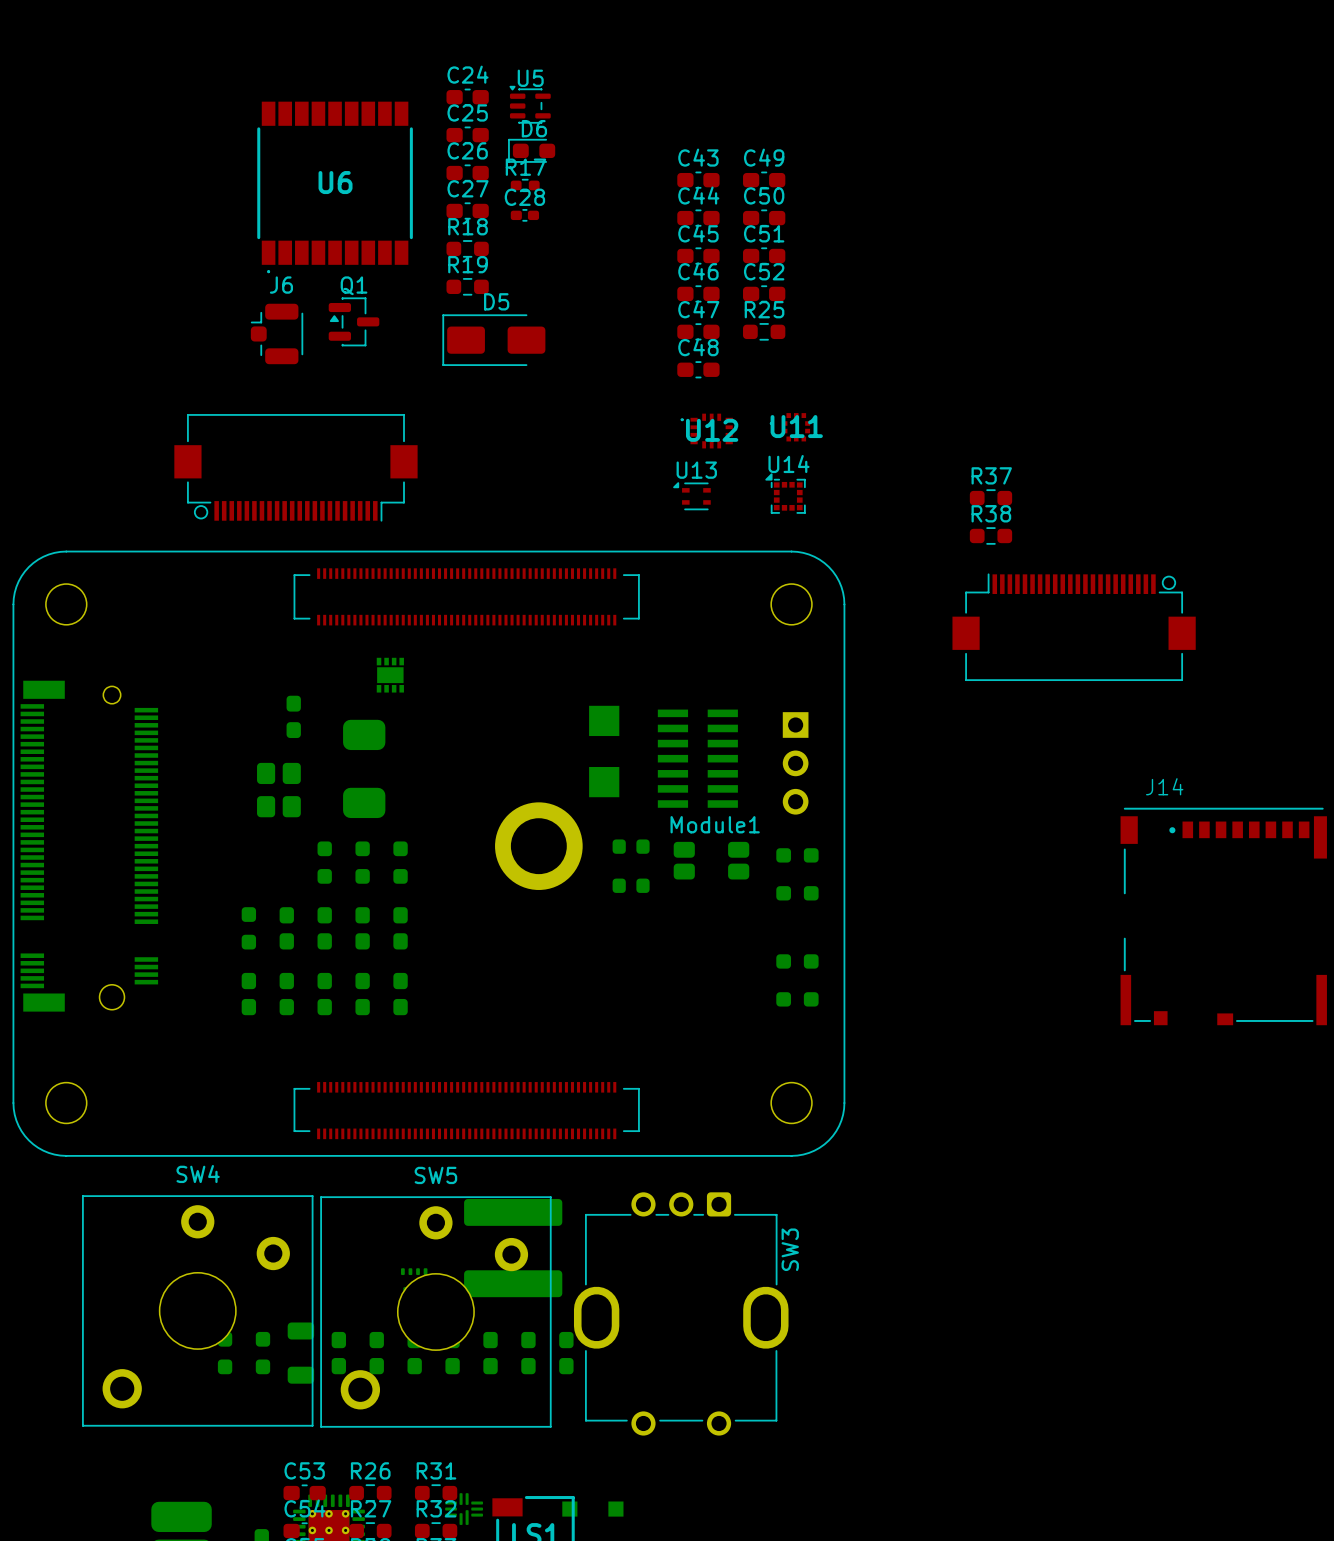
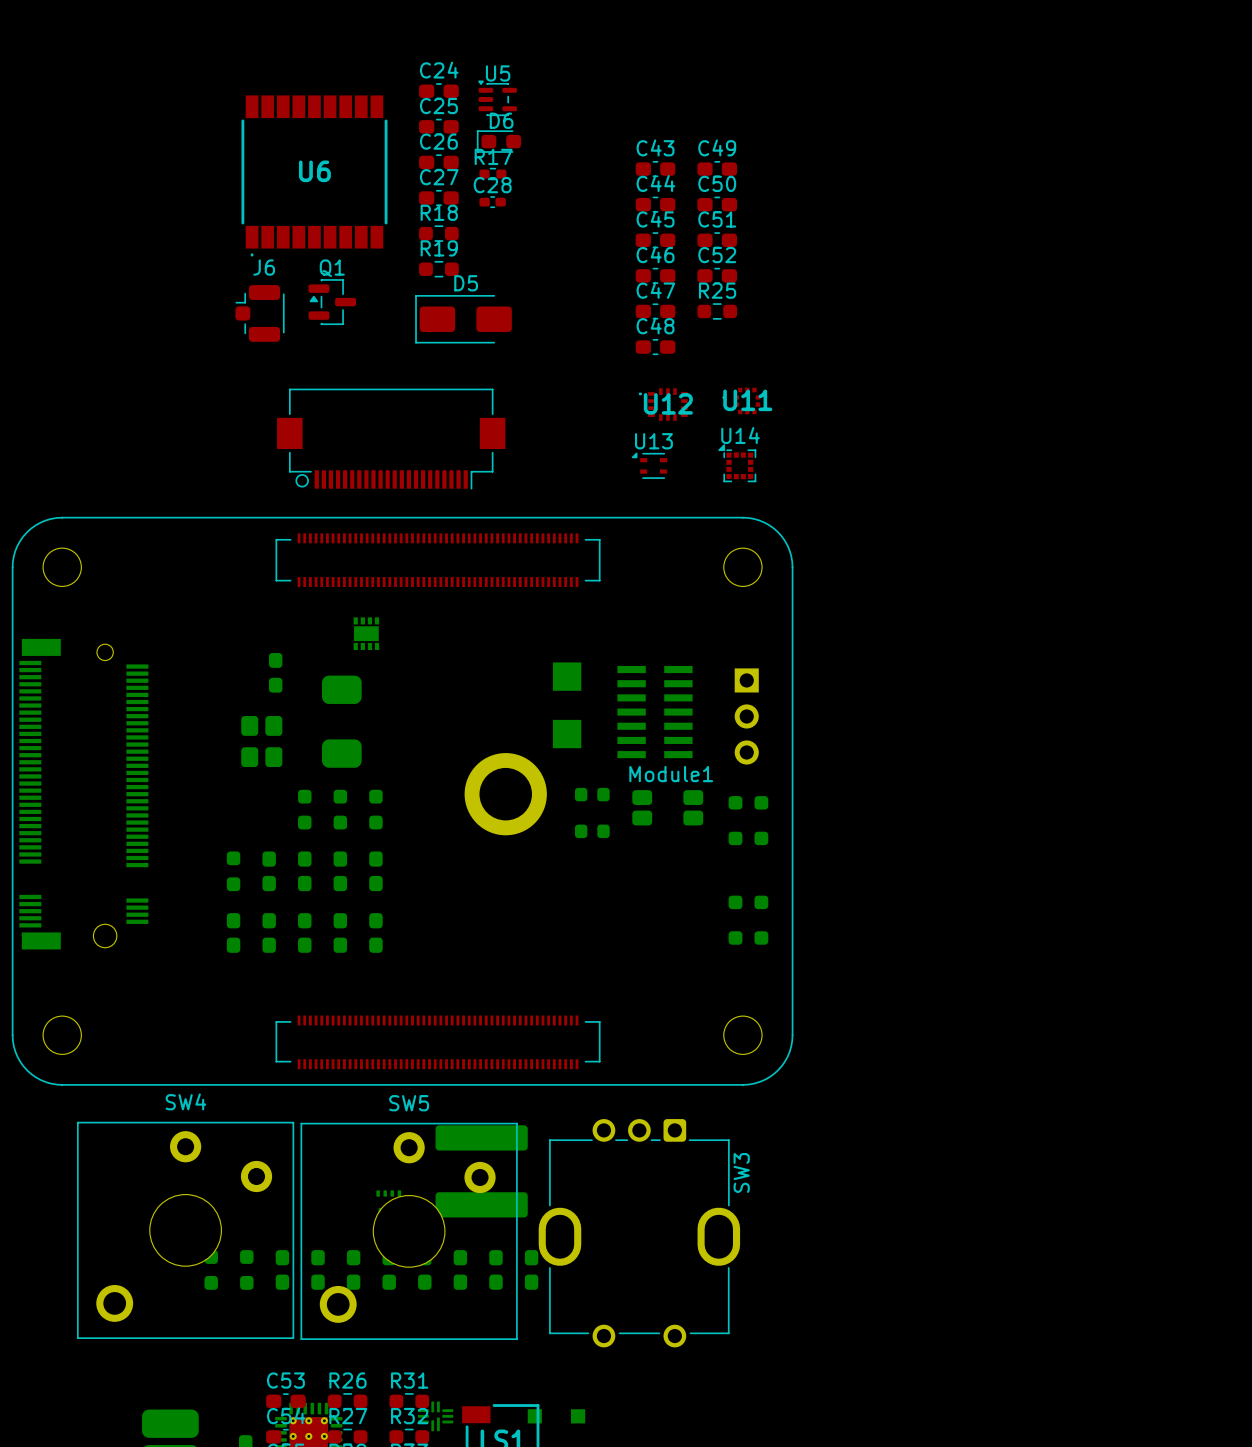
part position: (295, 467) -> (391, 439)
R37: (990, 498) -> none
R38: (990, 535) -> none
part: (1074, 627) -> none
J14: (1223, 916) -> none
part footprint: [287, 1322, 315, 1384] -> [275, 1250, 290, 1290]

